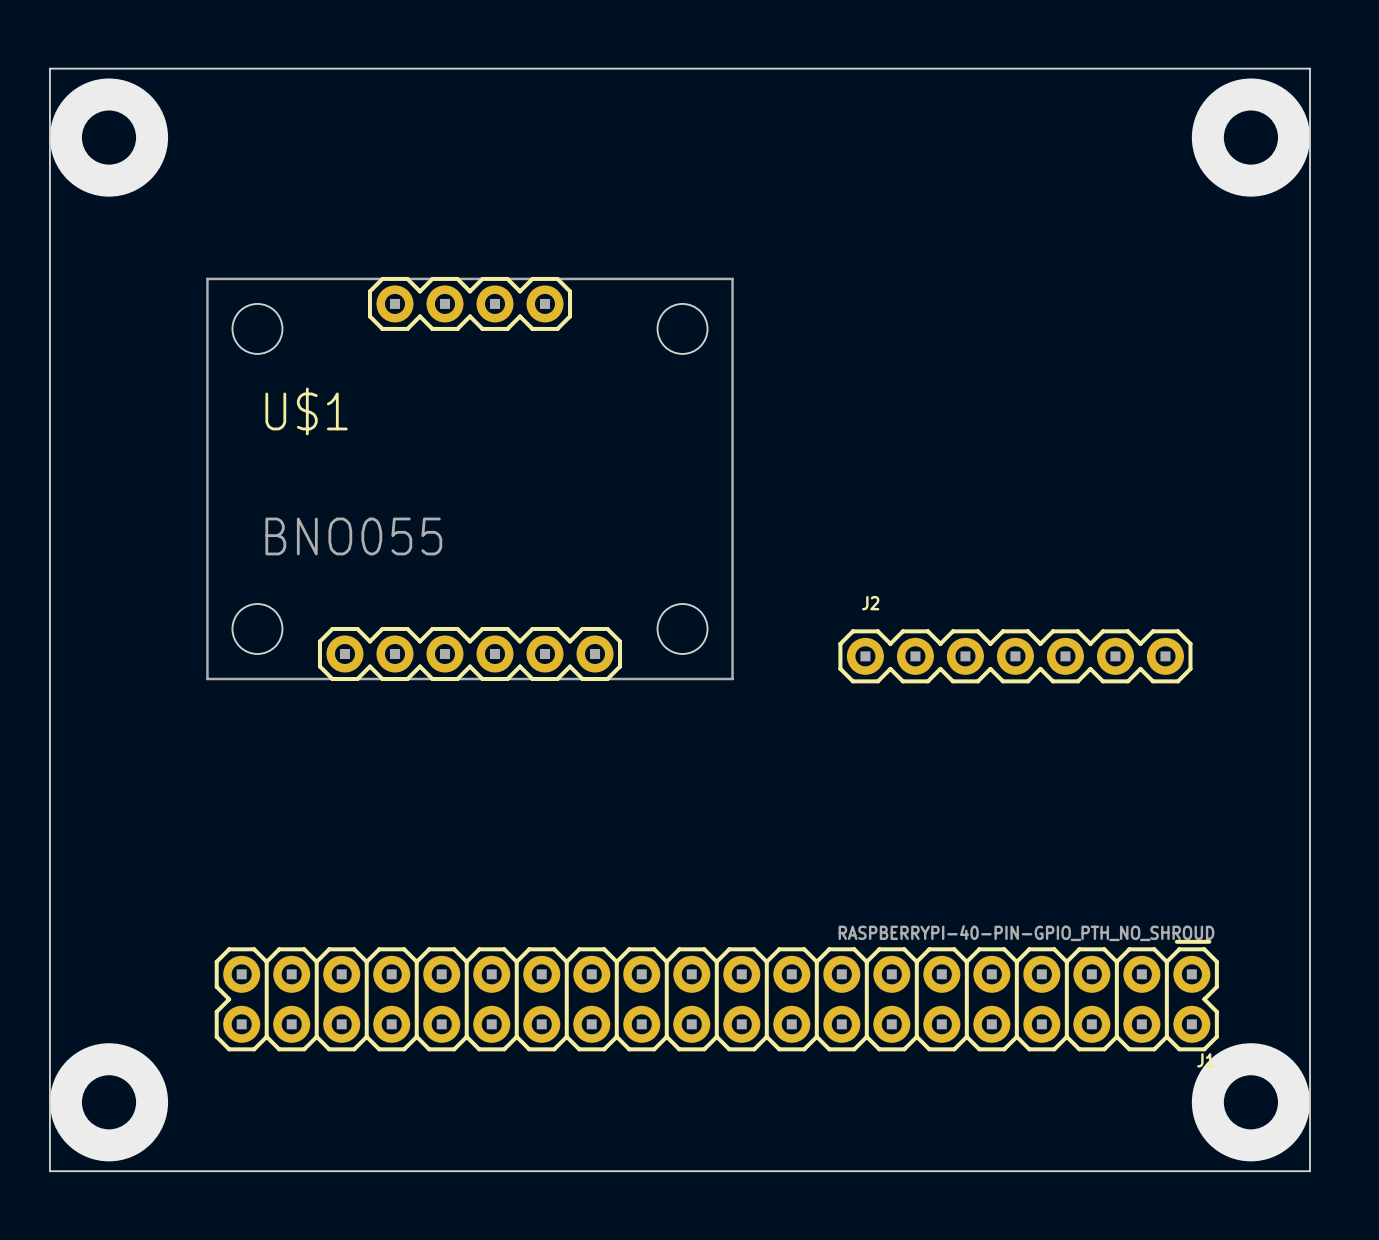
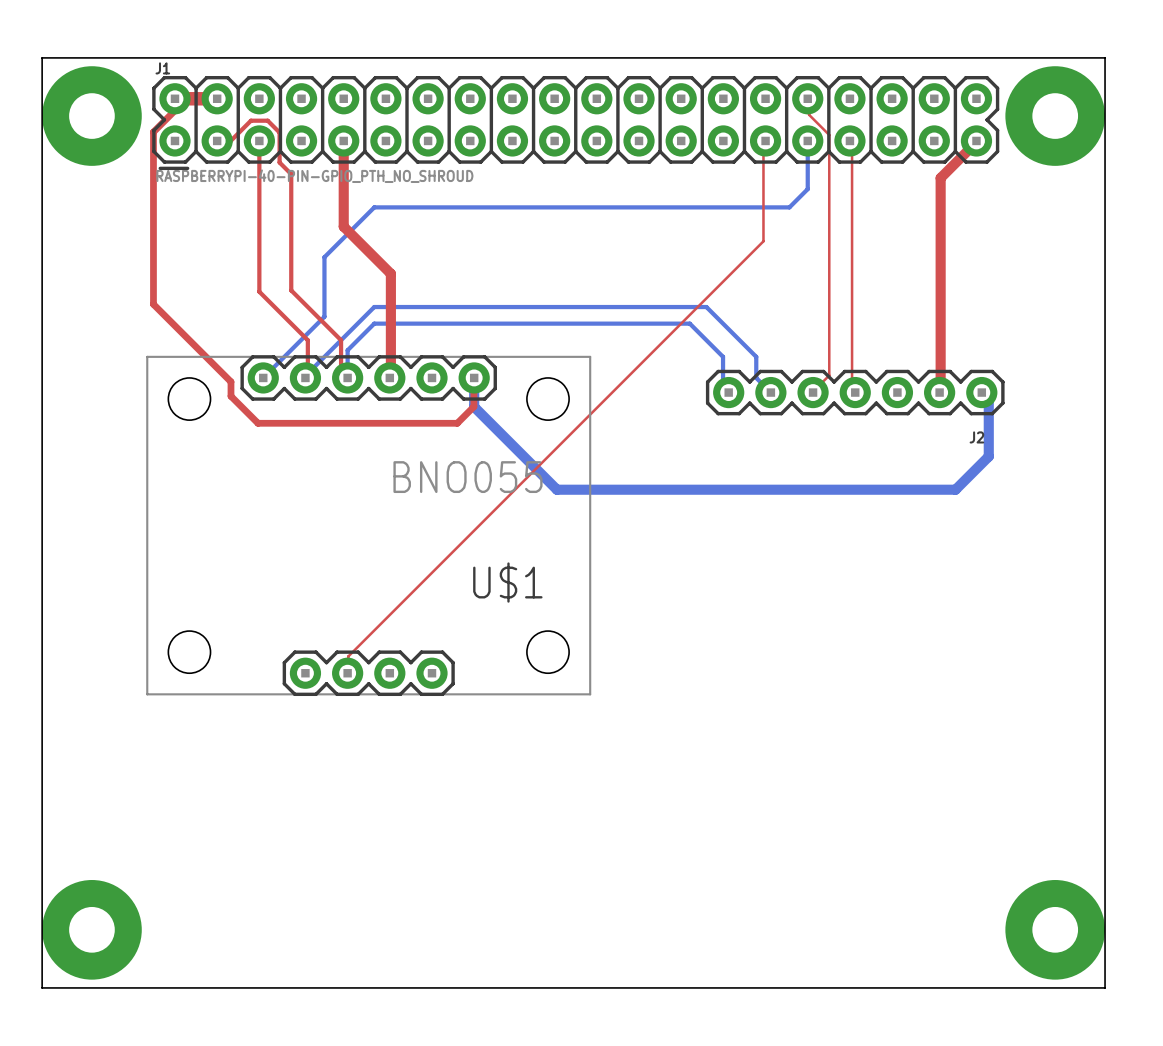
top track: none -> (217, 98) (174, 98) (174, 110) (153, 132) (153, 304) (230, 381) (230, 396) (258, 423) (457, 423) (473, 406) (474, 377)
top track: none -> (807, 98) (809, 114) (829, 134) (829, 375) (813, 392)
top track: none -> (217, 140) (230, 140) (250, 120) (267, 120) (279, 132) (279, 162) (291, 174) (291, 290) (341, 340) (341, 371) (347, 377)
top track: none -> (259, 140) (259, 291) (307, 340) (307, 375) (305, 377)
top track: none -> (343, 140) (343, 226) (390, 273) (389, 377)
top track: none -> (765, 140) (763, 142) (763, 241) (348, 656) (347, 673)
bottom track: none -> (807, 140) (807, 189) (789, 207) (374, 207) (324, 257) (324, 316) (263, 377)
top track: none -> (849, 140) (852, 142) (852, 388) (855, 392)
top track: none -> (976, 142) (976, 140) (940, 178) (939, 392) (940, 390)
bottom track: none -> (474, 375) (474, 406) (556, 489) (955, 489) (988, 456) (988, 399) (981, 392)
bottom track: none -> (307, 377) (305, 377) (305, 375) (374, 307) (706, 307) (756, 356) (756, 377) (770, 392) (768, 393)
bottom track: none -> (348, 377) (347, 350) (374, 323) (689, 323) (723, 356) (723, 386) (728, 392) (728, 390)
U$1 rotation: 0° (469, 478) -> 180° (368, 525)
J2 name position: J2 (870, 603) -> J2 (976, 437)
J2 position: (1015, 656) -> (855, 392)
J1 rotation: 0° (716, 995) -> 180° (575, 123)
J1 position: (716, 995) -> (575, 123)

